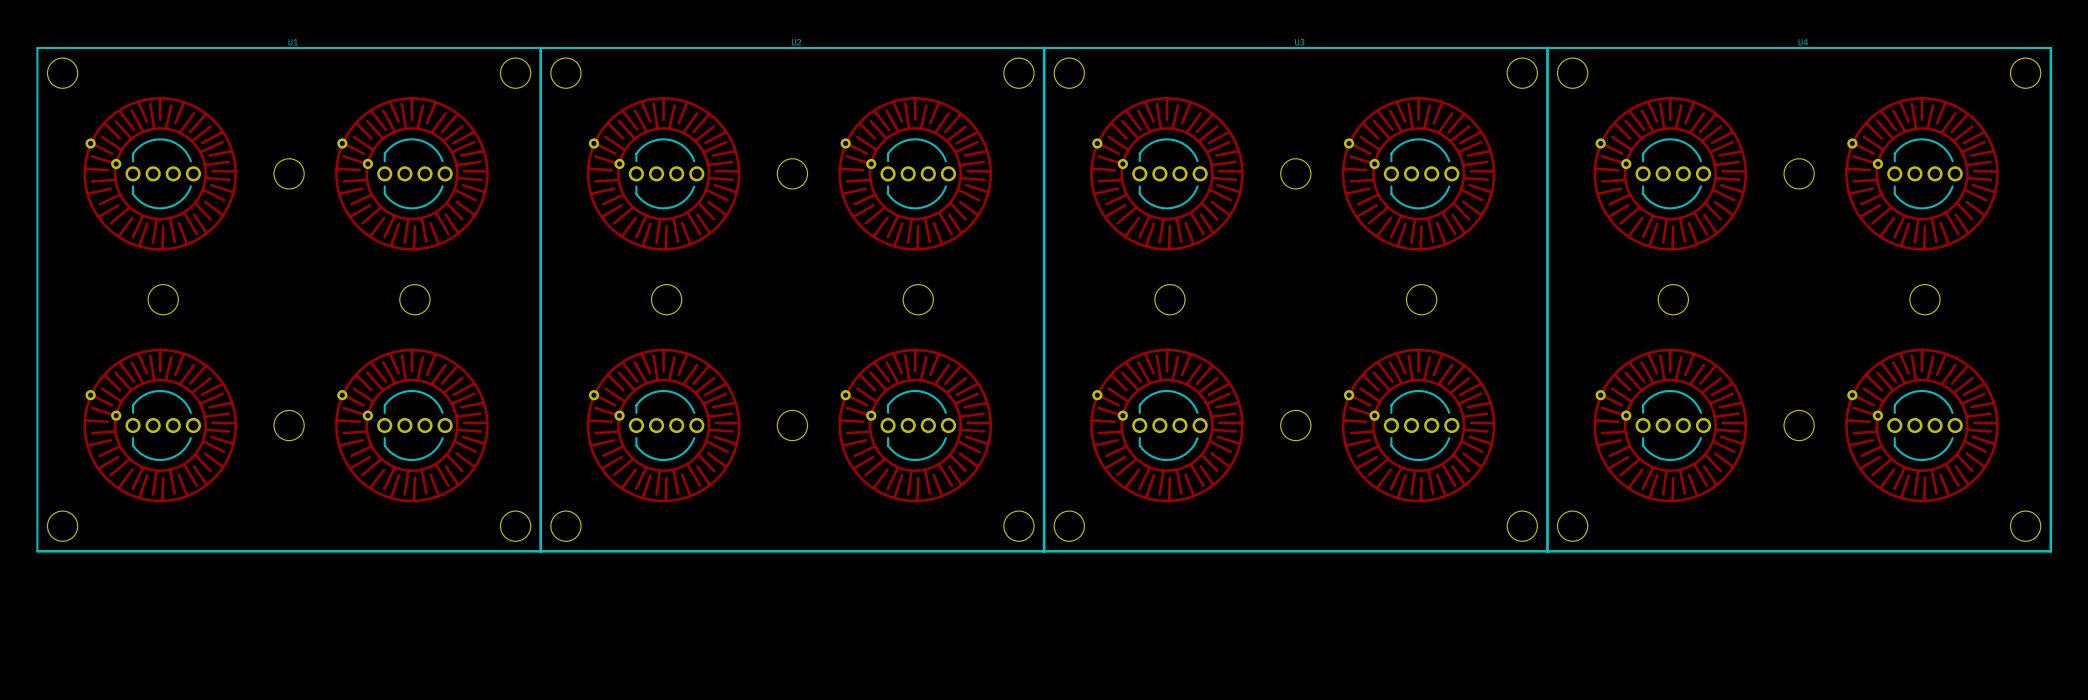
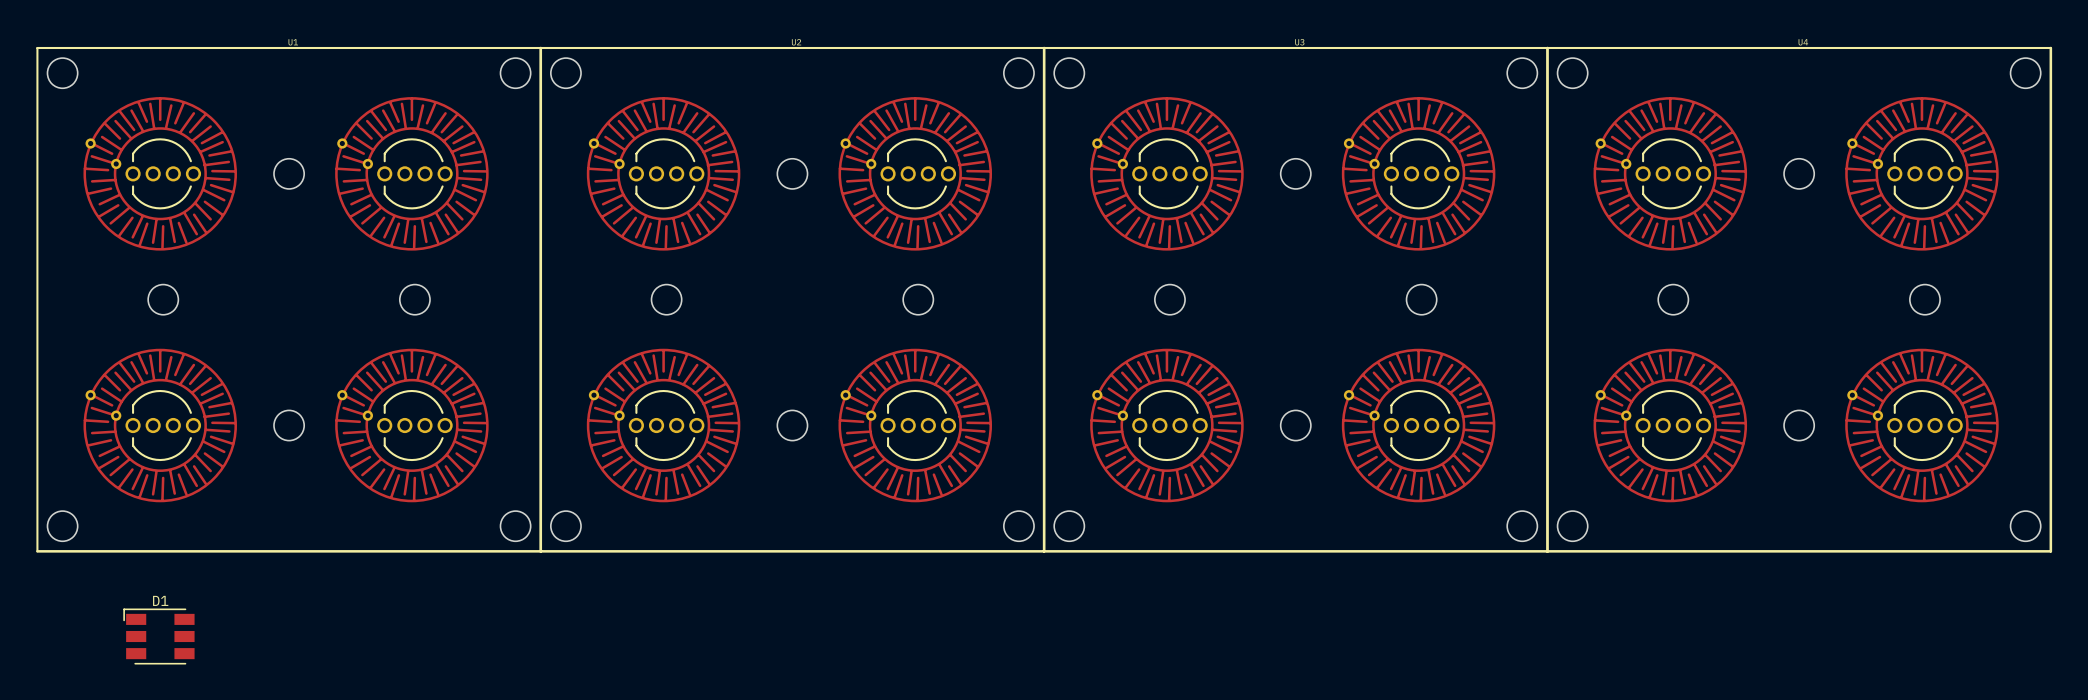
D1: none -> (159, 636)

